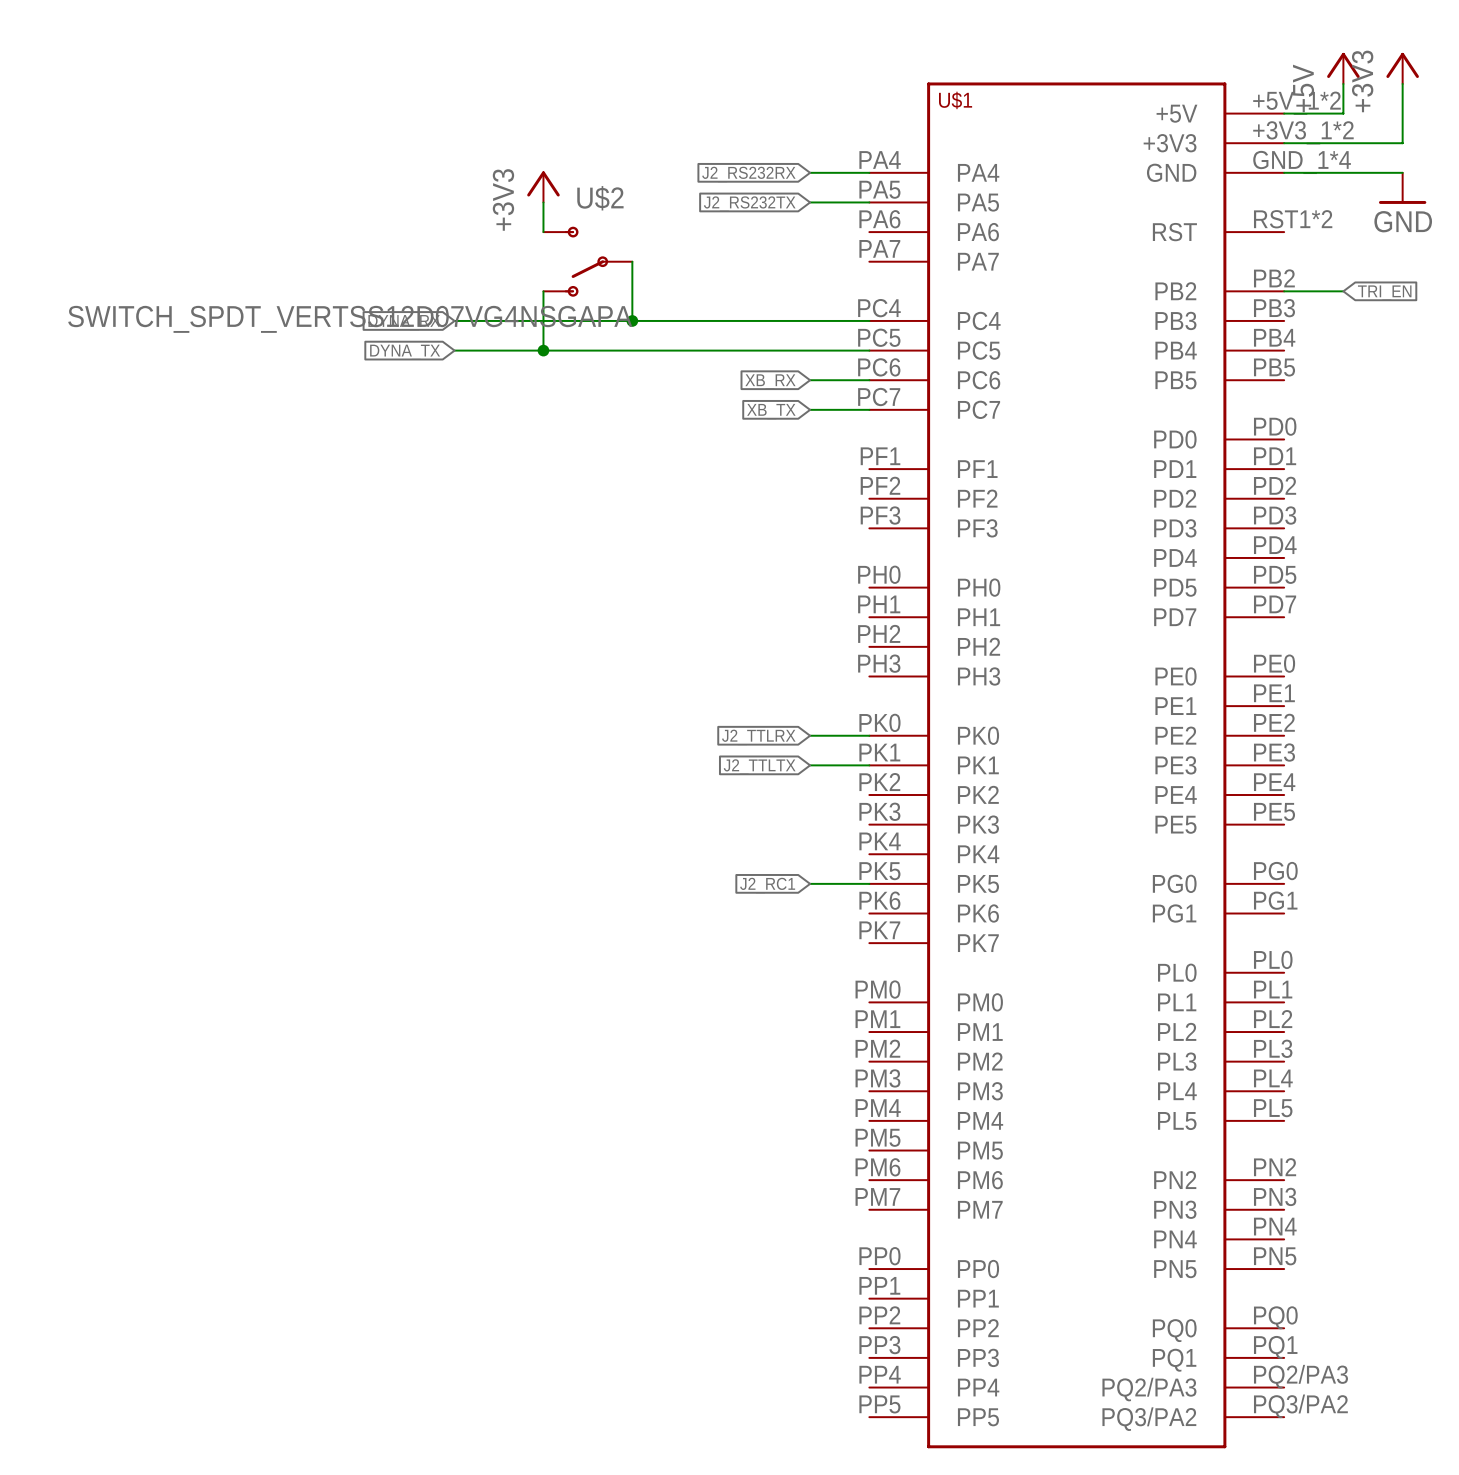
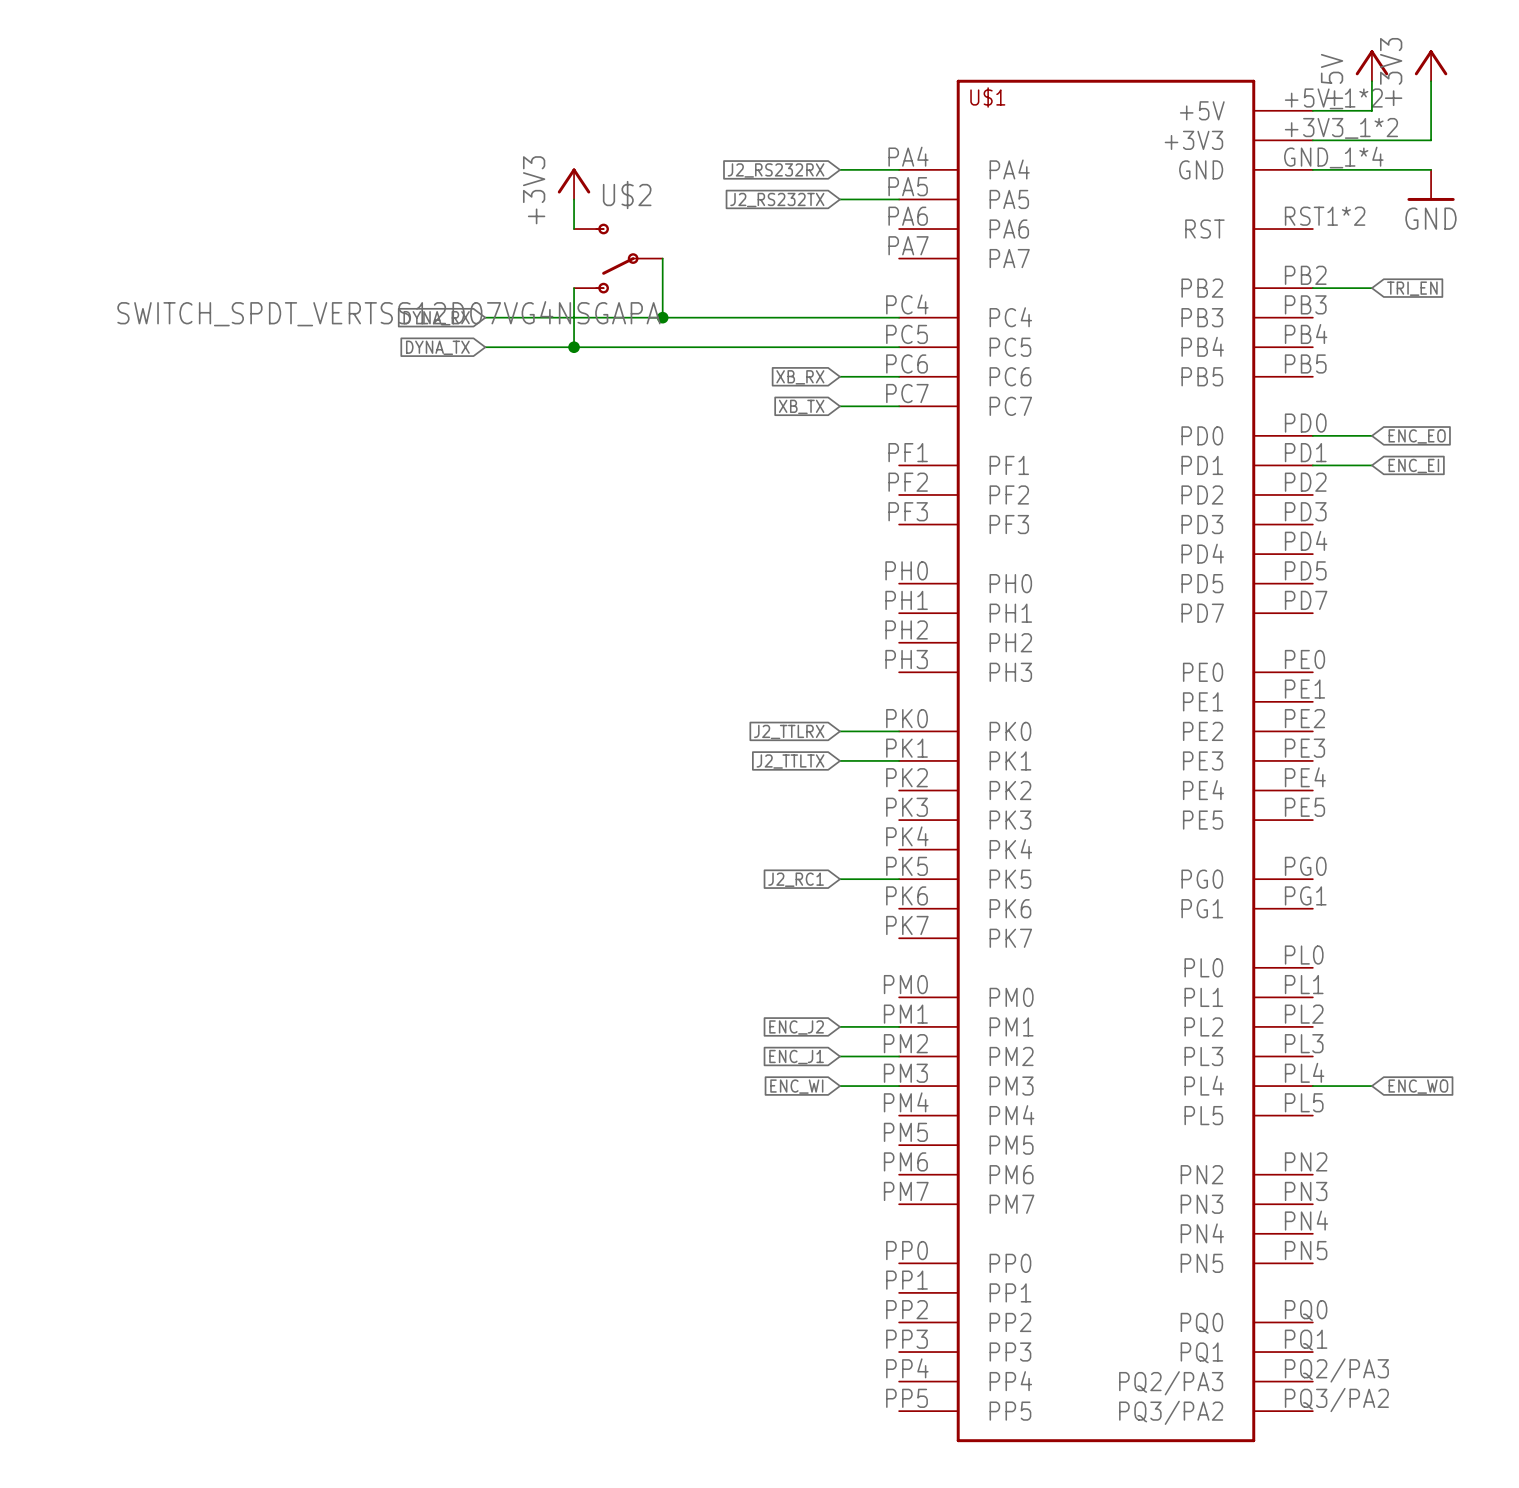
wire: none -> (1312, 435) (1371, 435)
global label: none -> ENC_EO (1417, 436)
wire: none -> (1312, 465) (1371, 465)
global label: none -> ENC_EI (1413, 465)
wire: none -> (840, 1026) (899, 1026)
global label: none -> ENC_J2 (796, 1027)
wire: none -> (840, 1056) (899, 1056)
global label: none -> ENC_J1 (796, 1057)
wire: none -> (840, 1086) (899, 1086)
wire: none -> (1312, 1086) (1371, 1086)
global label: none -> ENC_WI (796, 1086)
global label: none -> ENC_WO (1418, 1086)

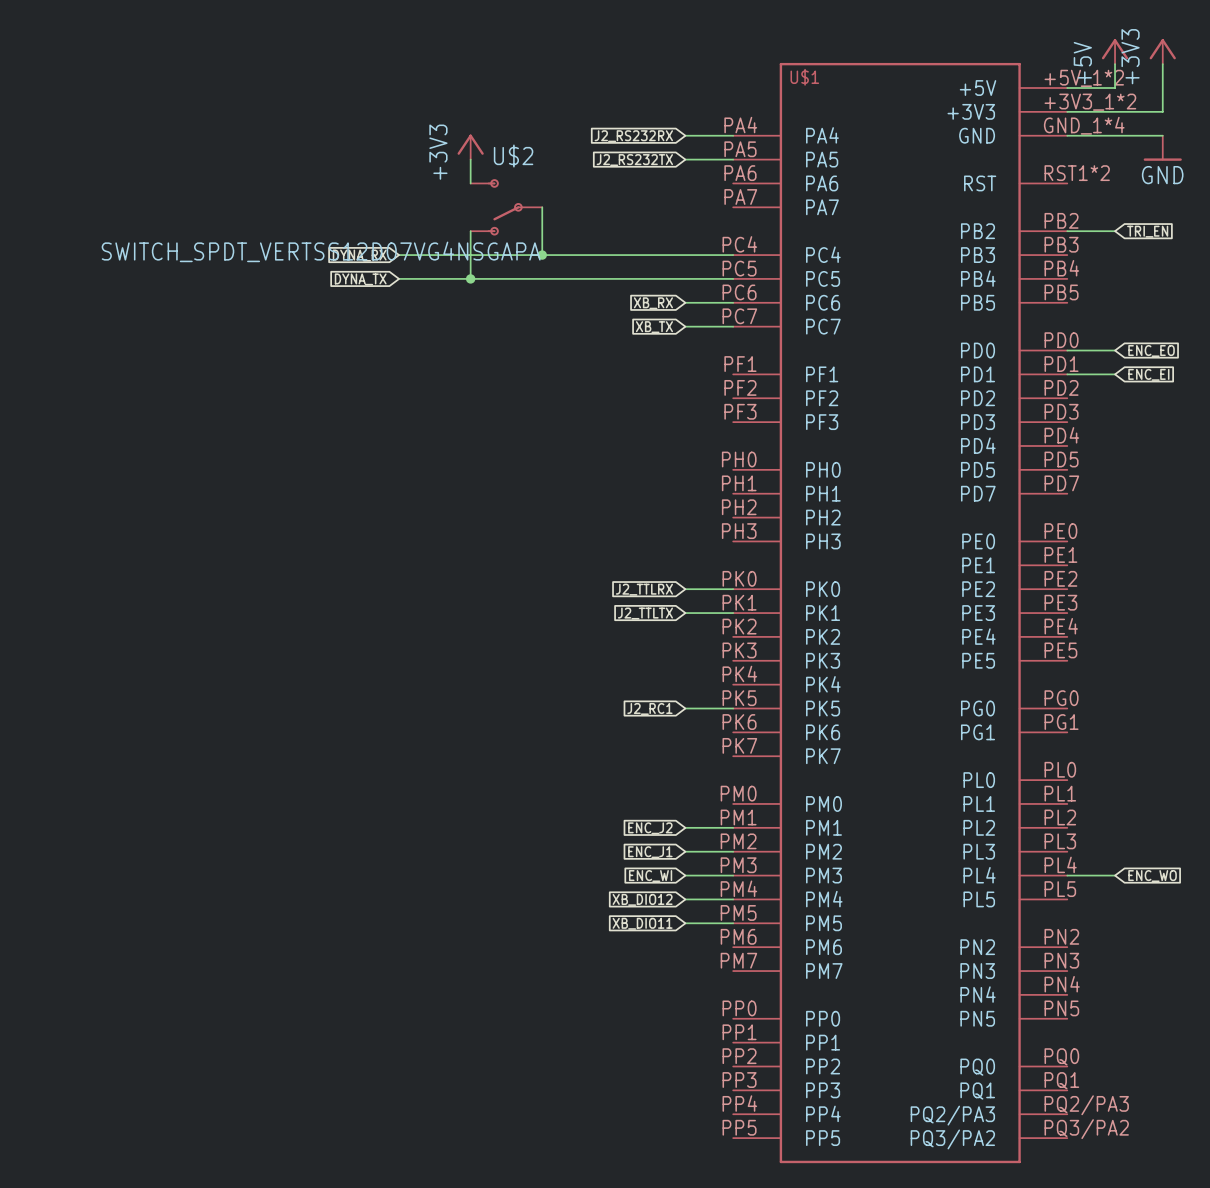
wire: none -> (685, 899) (733, 899)
global label: none -> XB_DIO12 (642, 899)
global label: none -> XB_DIO11 (642, 923)
wire: none -> (685, 923) (733, 923)

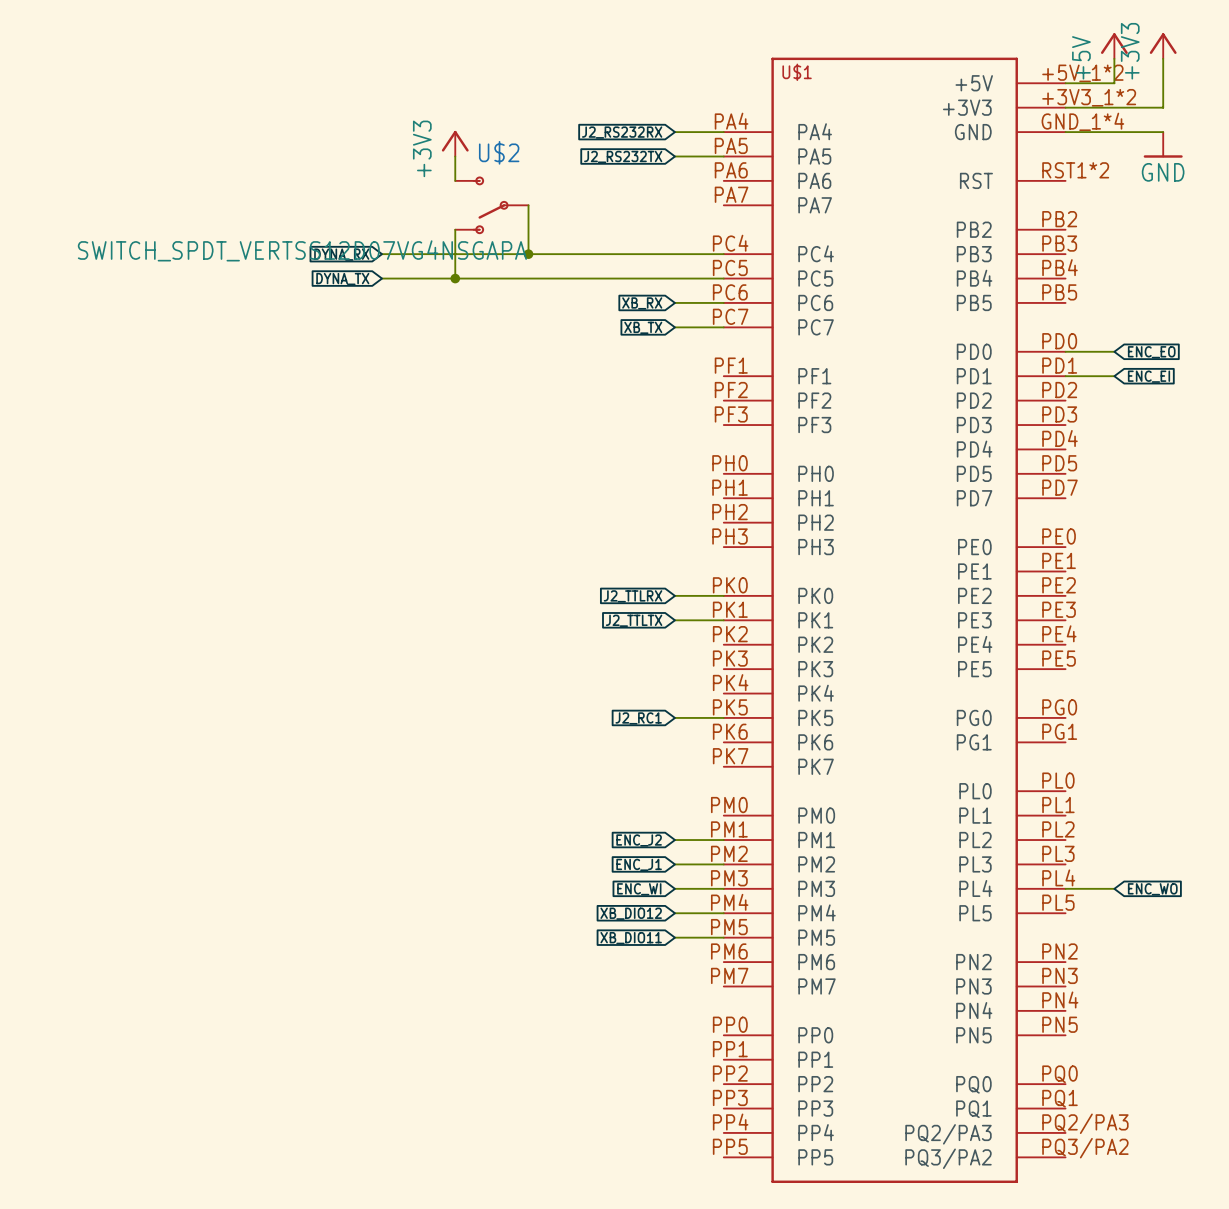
wire: (1067, 231) (1115, 231) -> none
global label: TRI_EN (1147, 231) -> none

